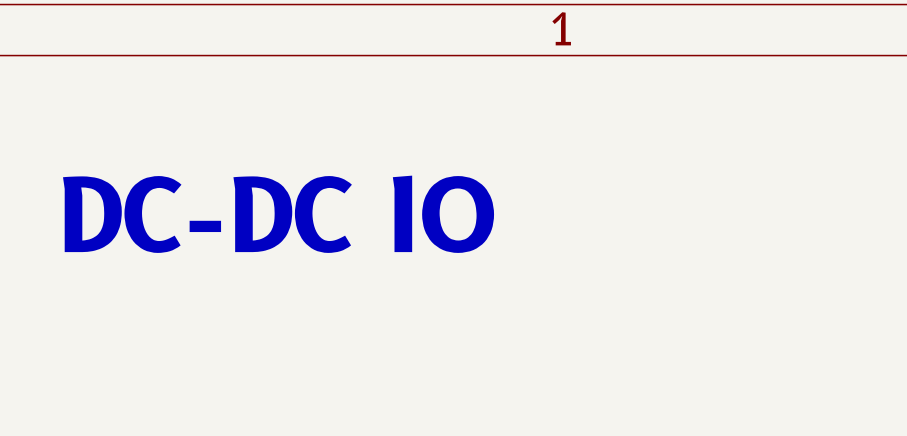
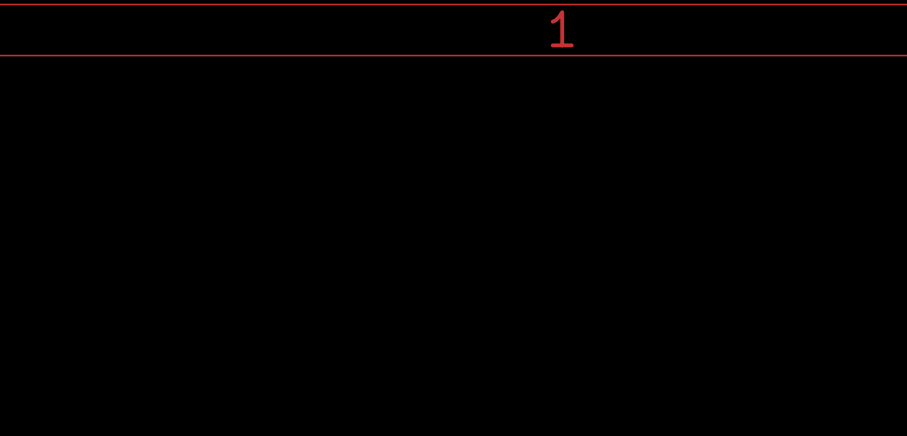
text: DC-DC IO (278, 214) -> none

